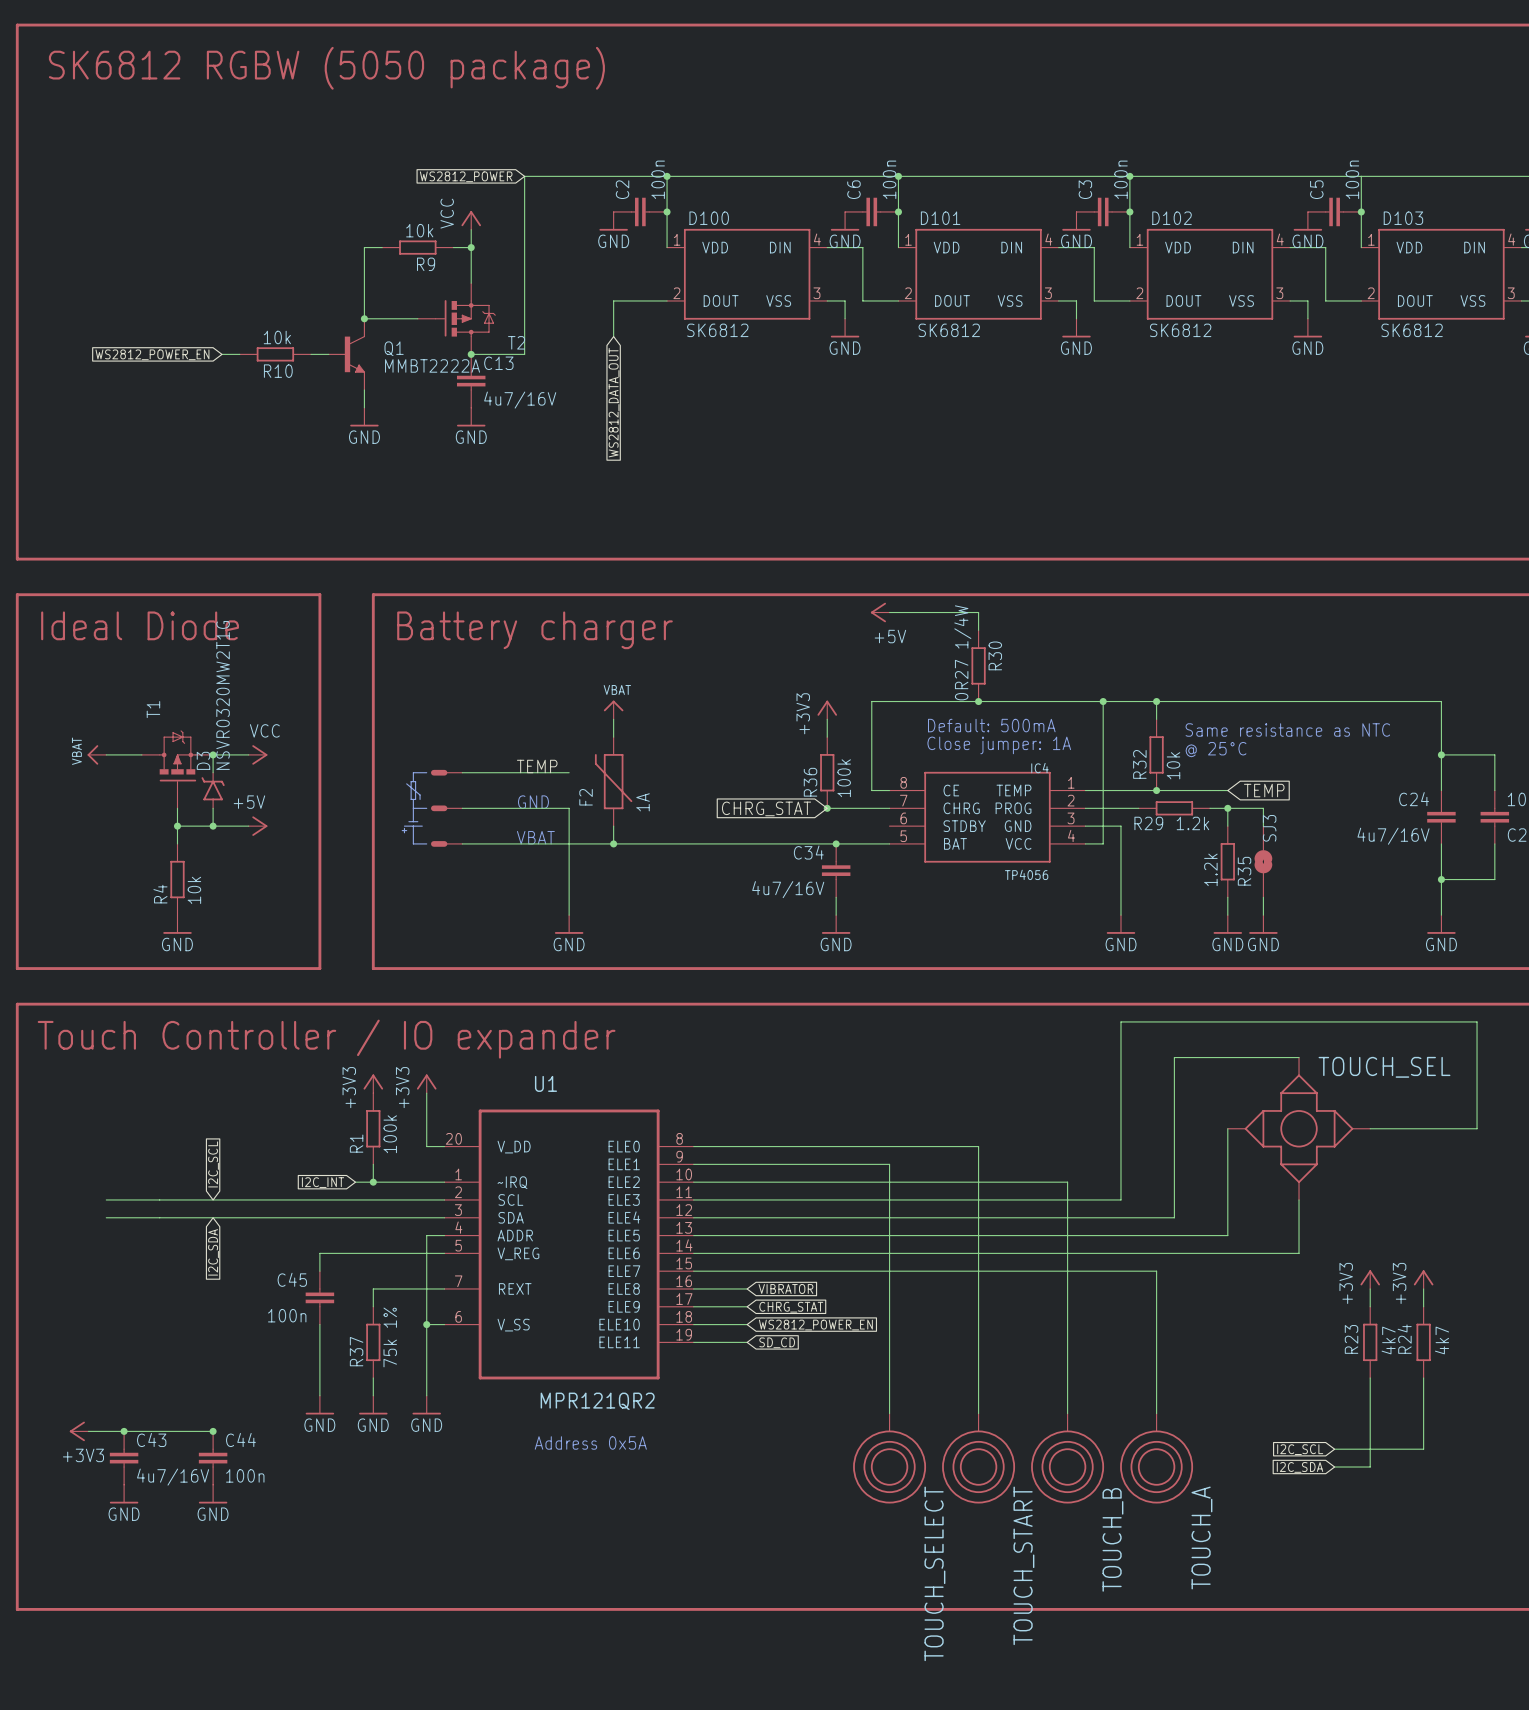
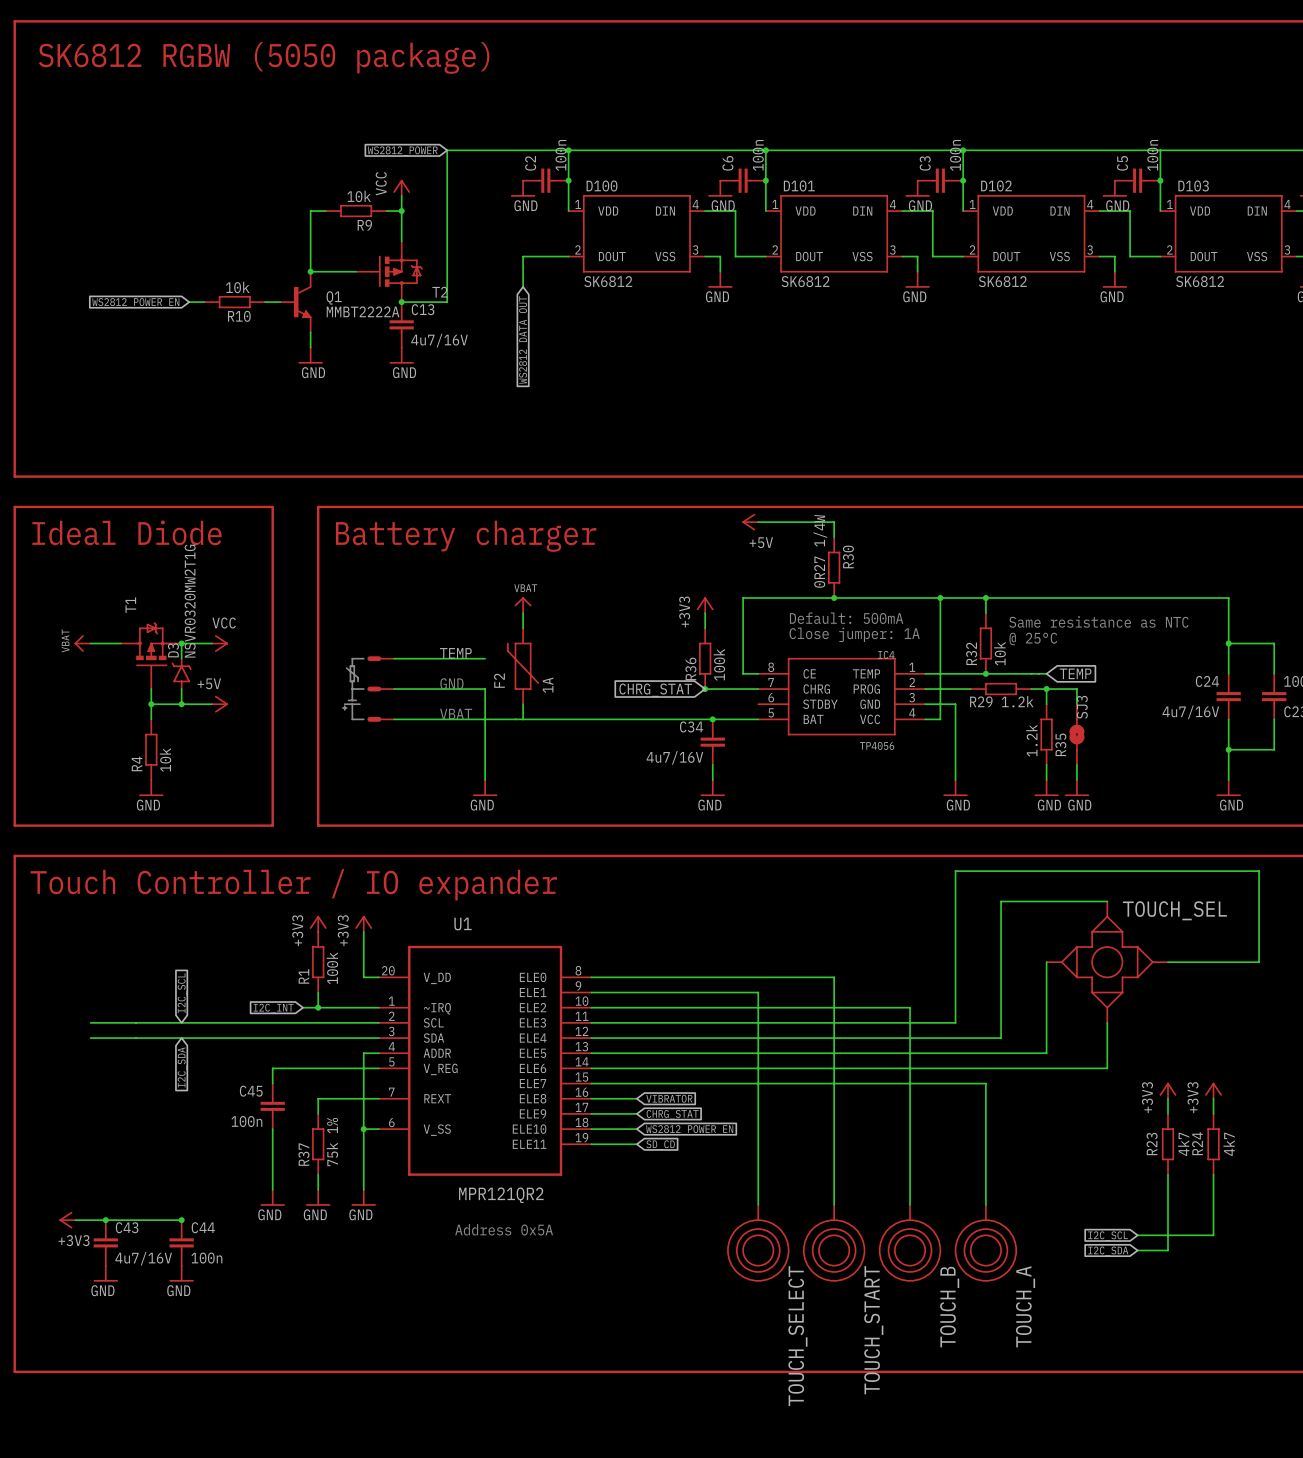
junction: (613, 843) -> none

